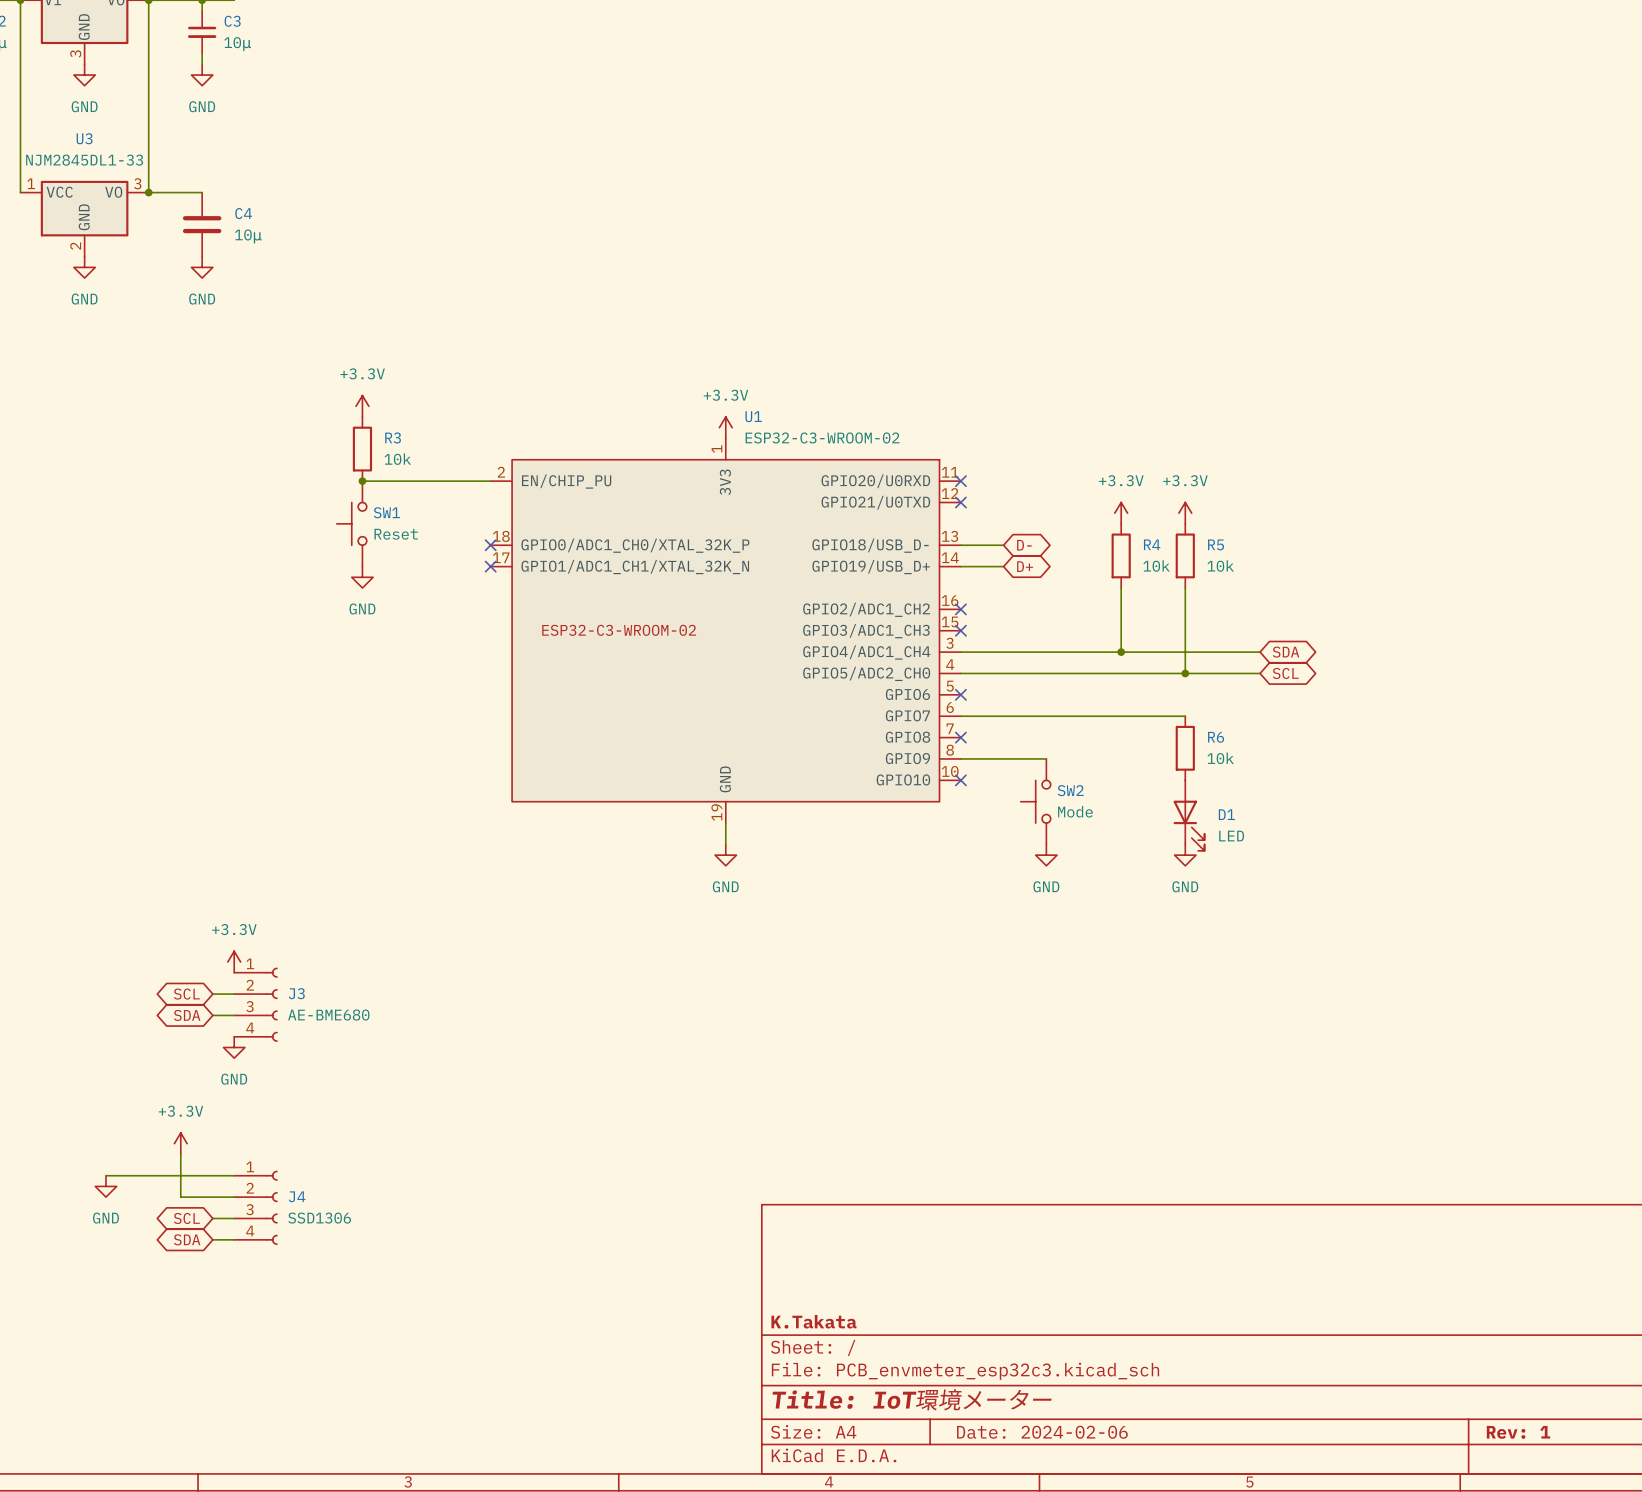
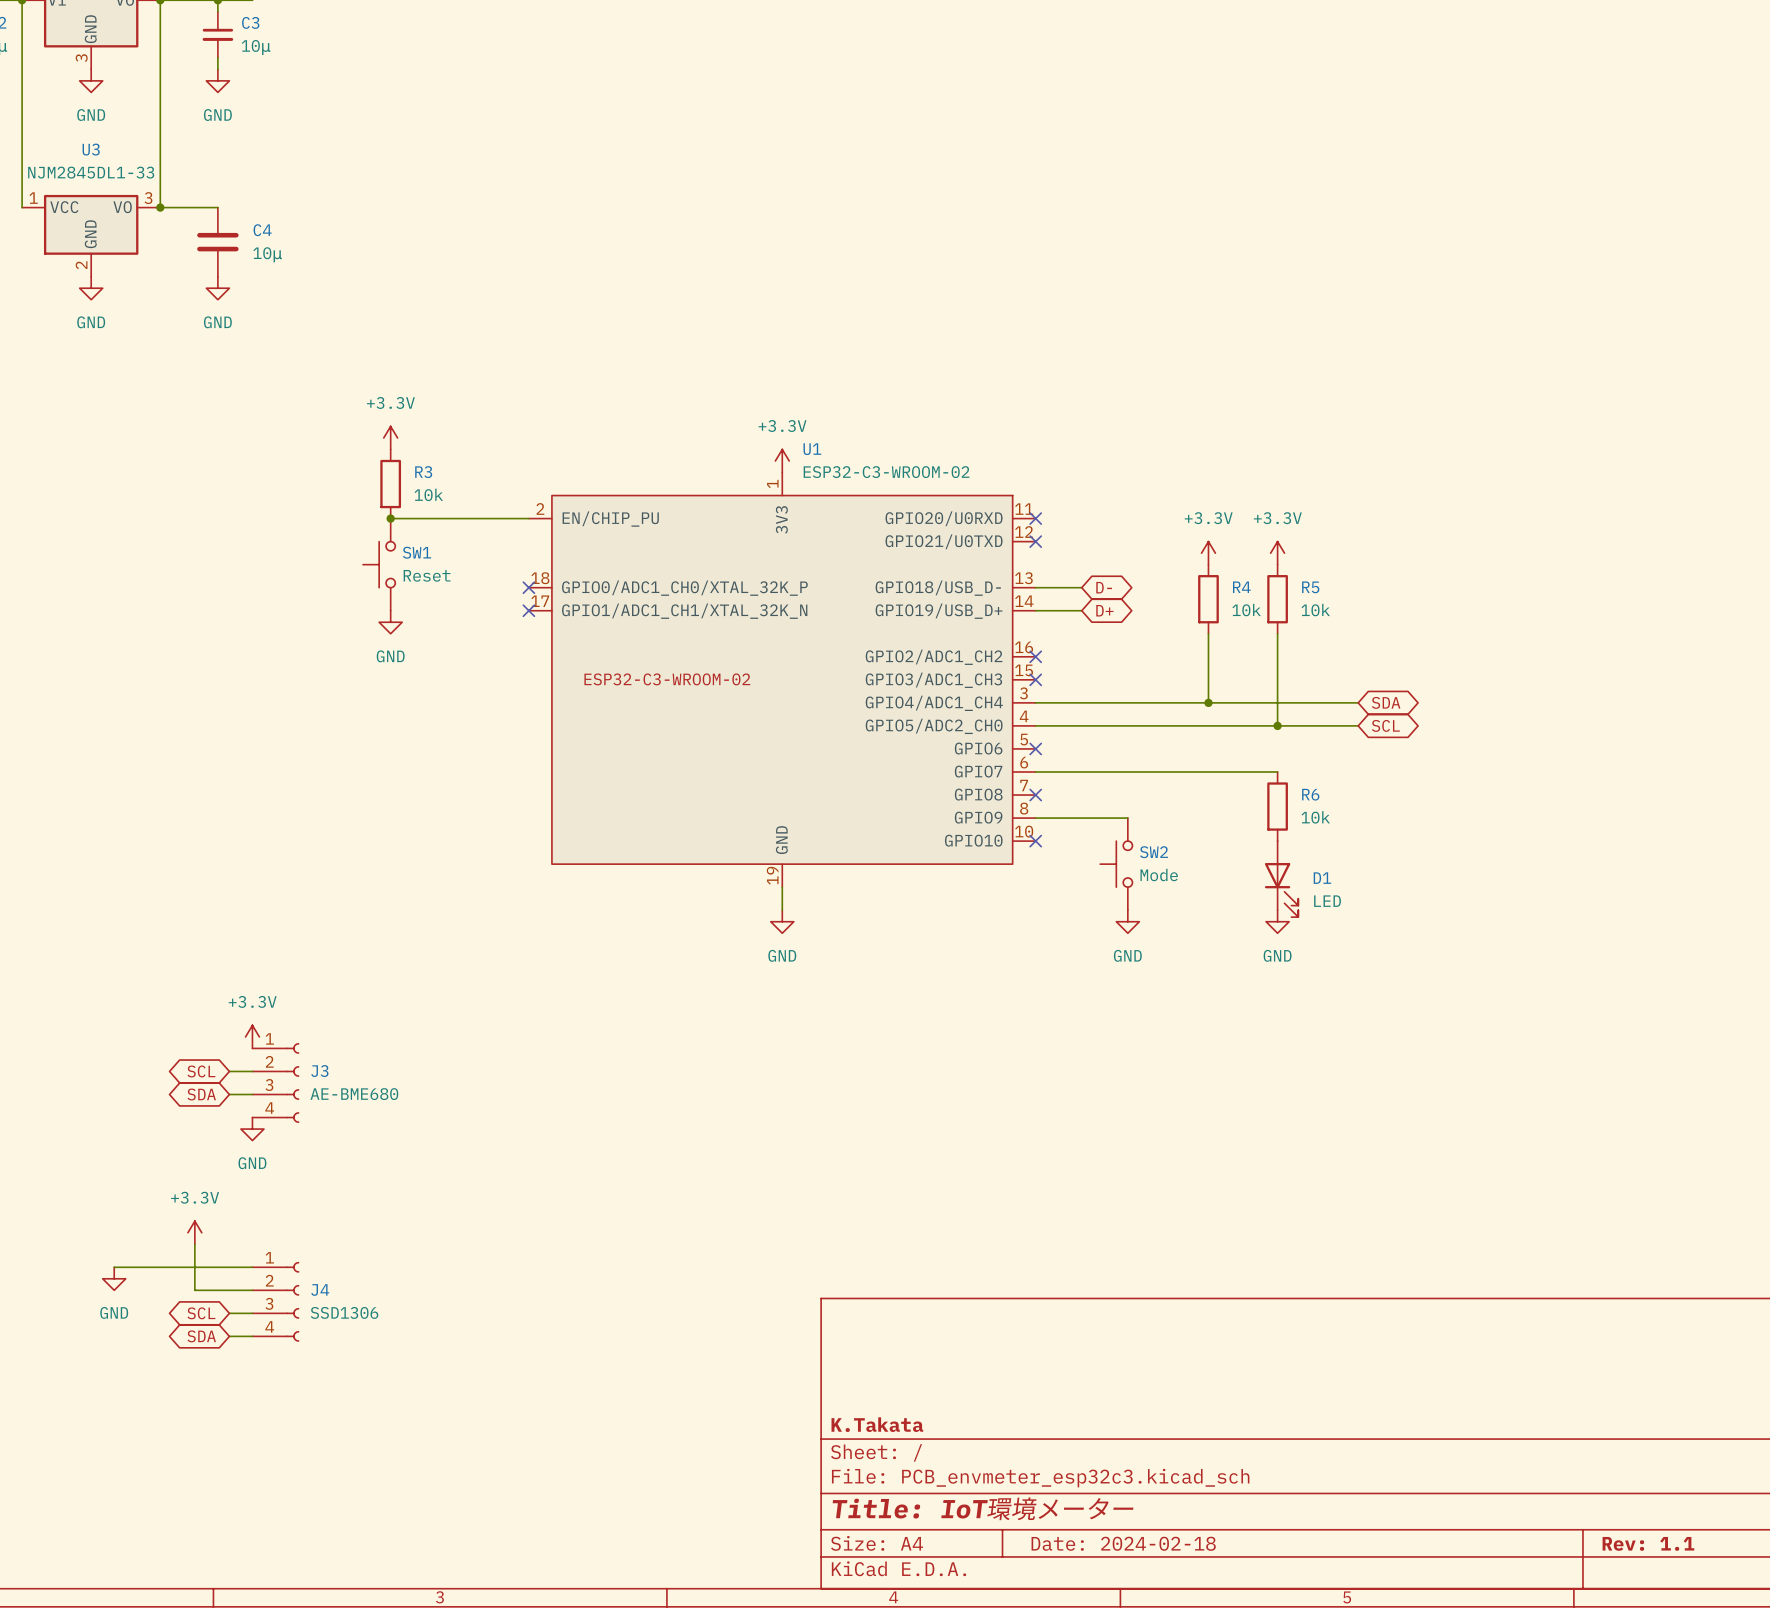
title block: Date: 2024-02-06 (1042, 1432) -> Date: 2024-02-18 (1123, 1543)
title block: Rev: 1 (1518, 1432) -> Rev: 1.1 (1648, 1543)

